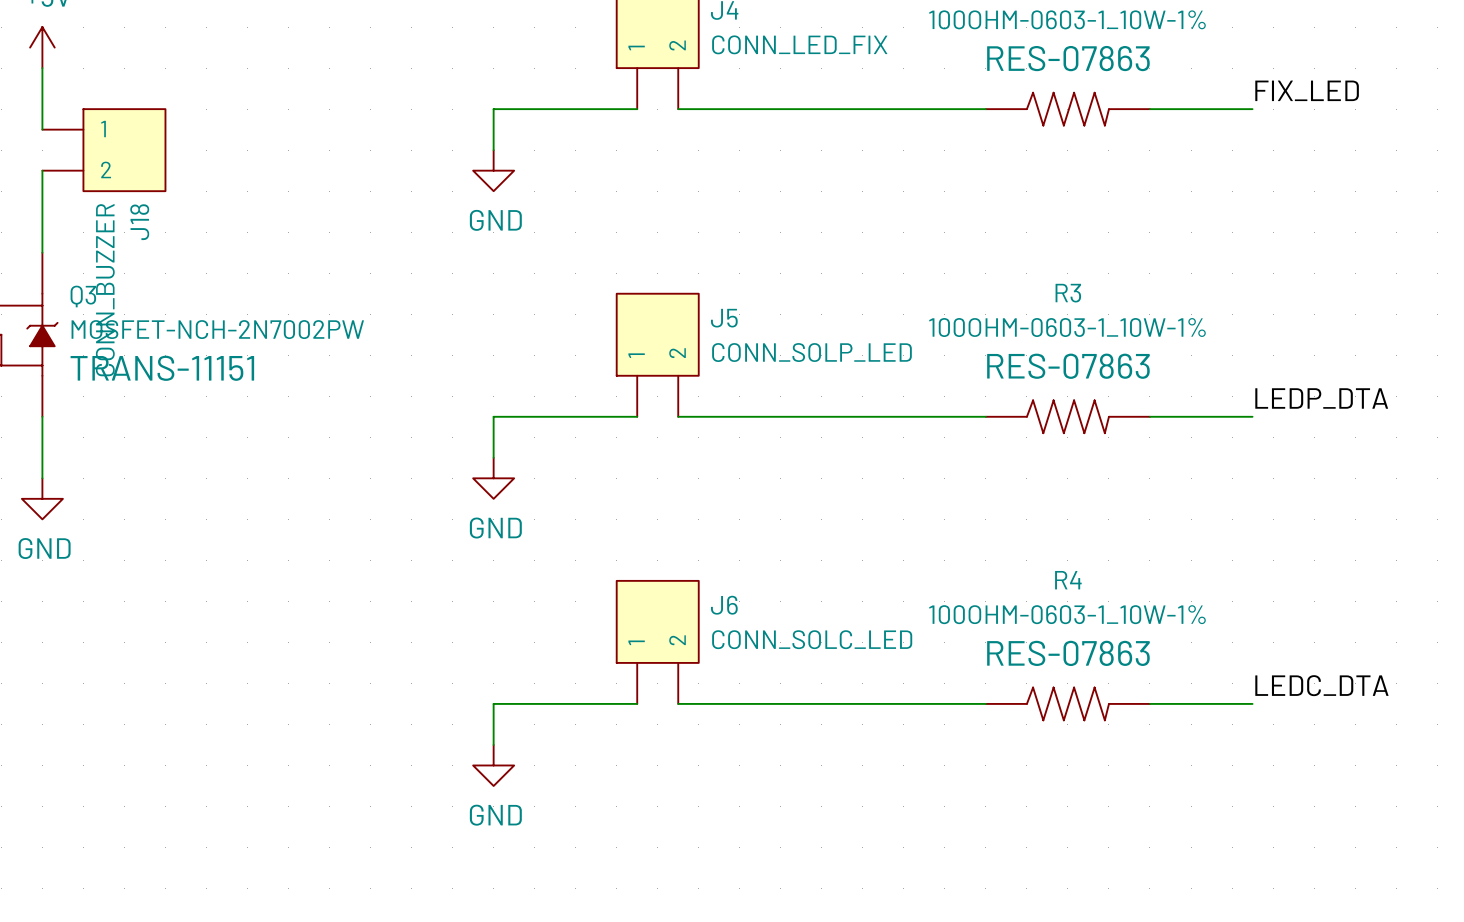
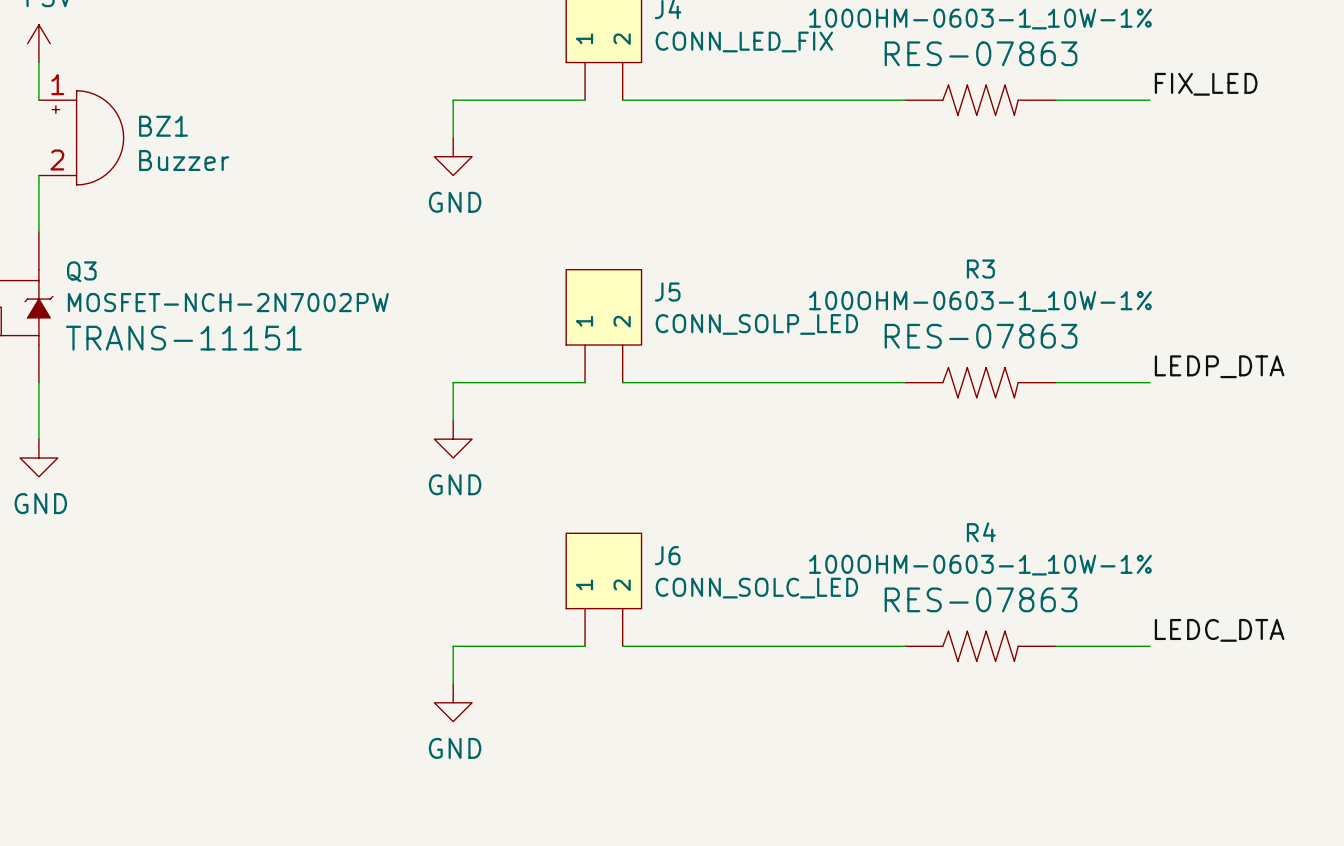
wire: (42, 109) (42, 129) -> none
BZ1: none -> Buzzer (81, 137)
J18: CONN_BUZZER (103, 150) -> none
wire: (42, 170) (42, 191) -> none

